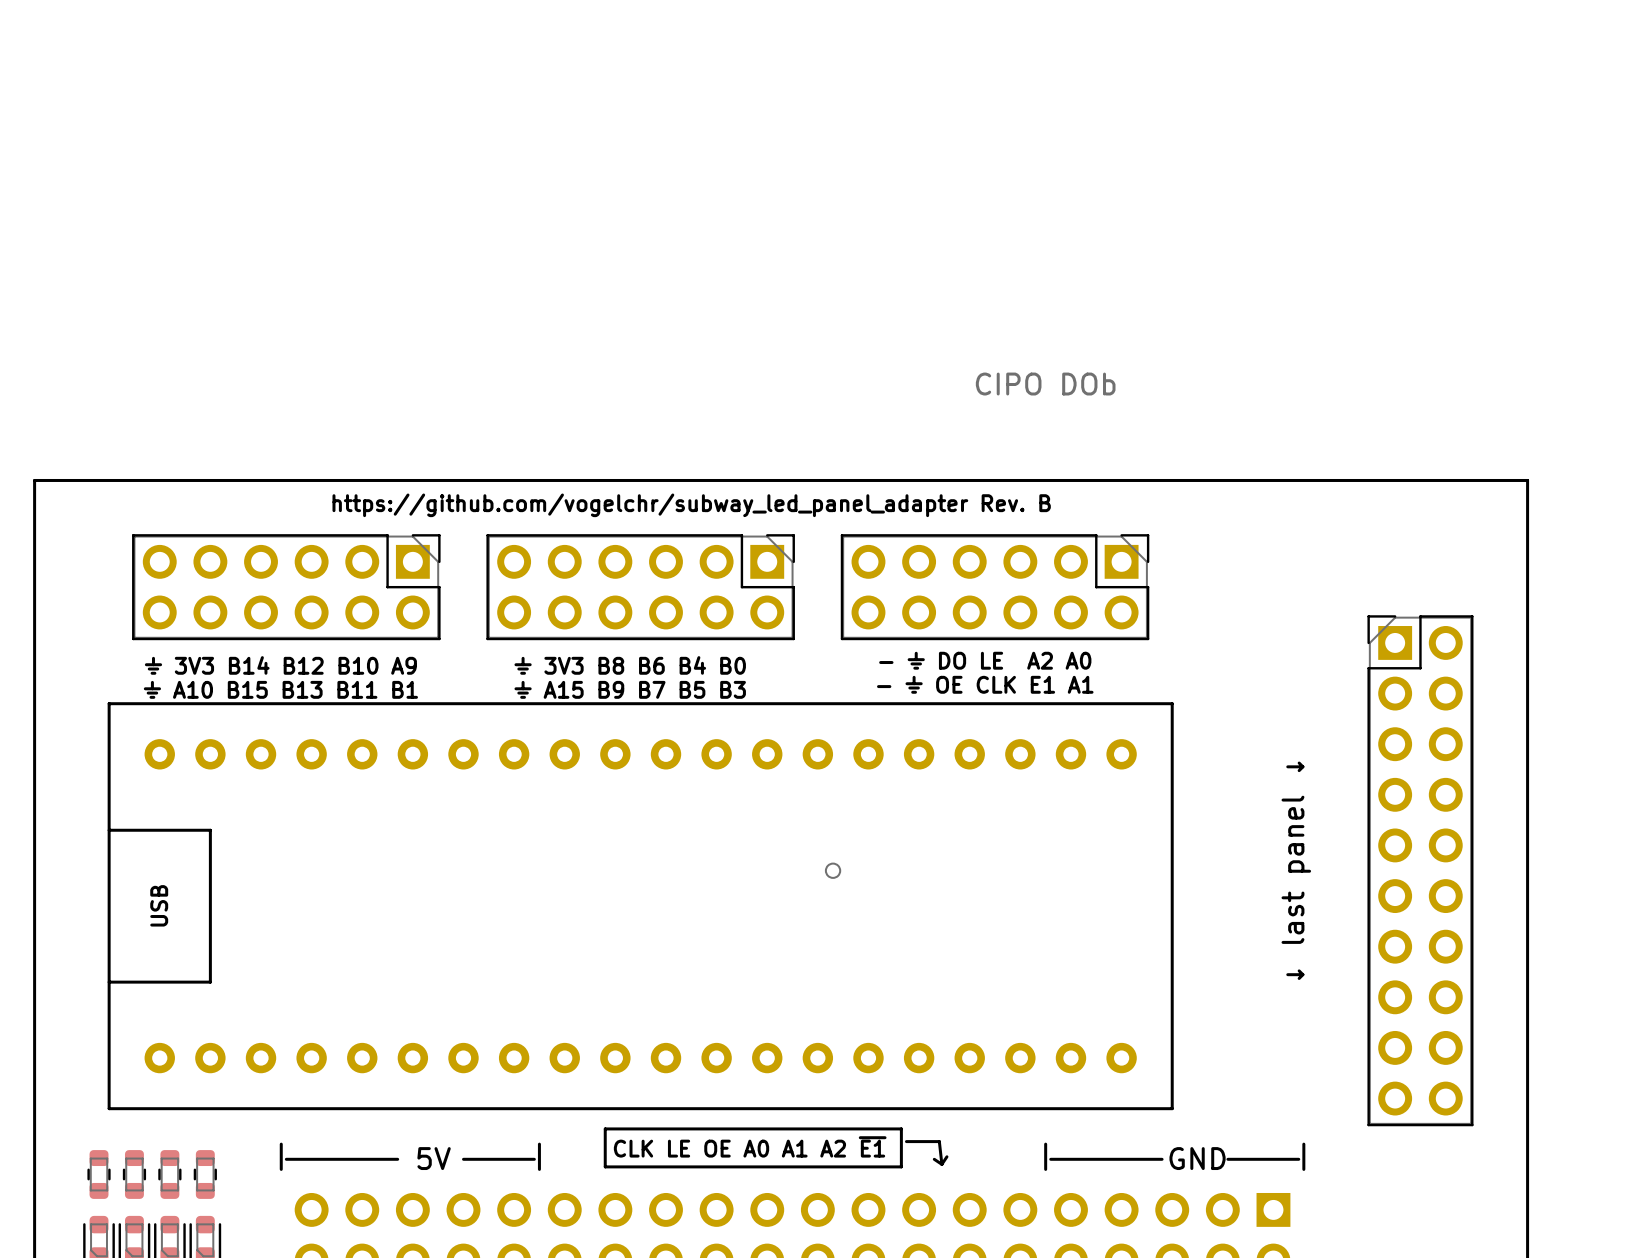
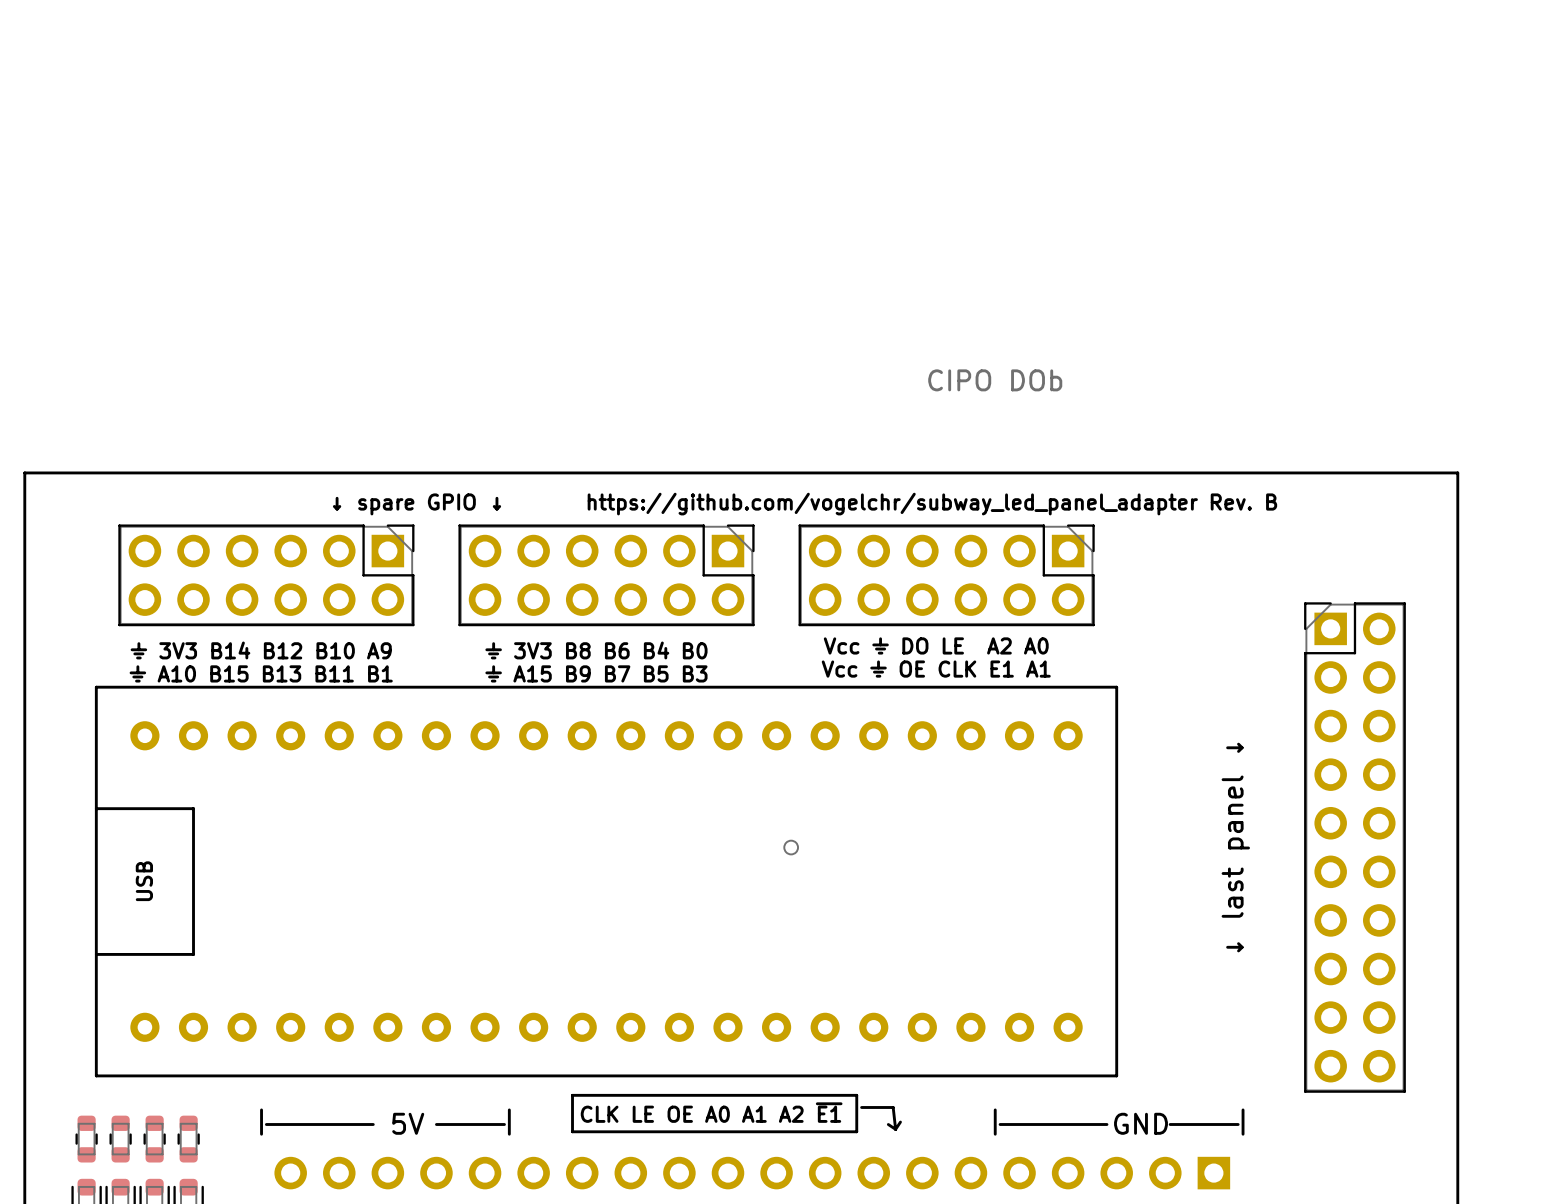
text position: https://github.com/vogelchr/subway_led_panel_adapter Rev. B (691, 505) -> https://github.com/vogelchr/subway_led_panel_adapter Rev. B (932, 504)
text: none -> ↓ spare GPIO ↓ (417, 504)
text: - ⏚ DO LE A2 A0 (985, 660) -> Vcc ⏚ DO LE A2 A0 (936, 645)
text: - ⏚ OE CLK E1 A1 (985, 684) -> Vcc ⏚ OE CLK E1 A1 (936, 669)

